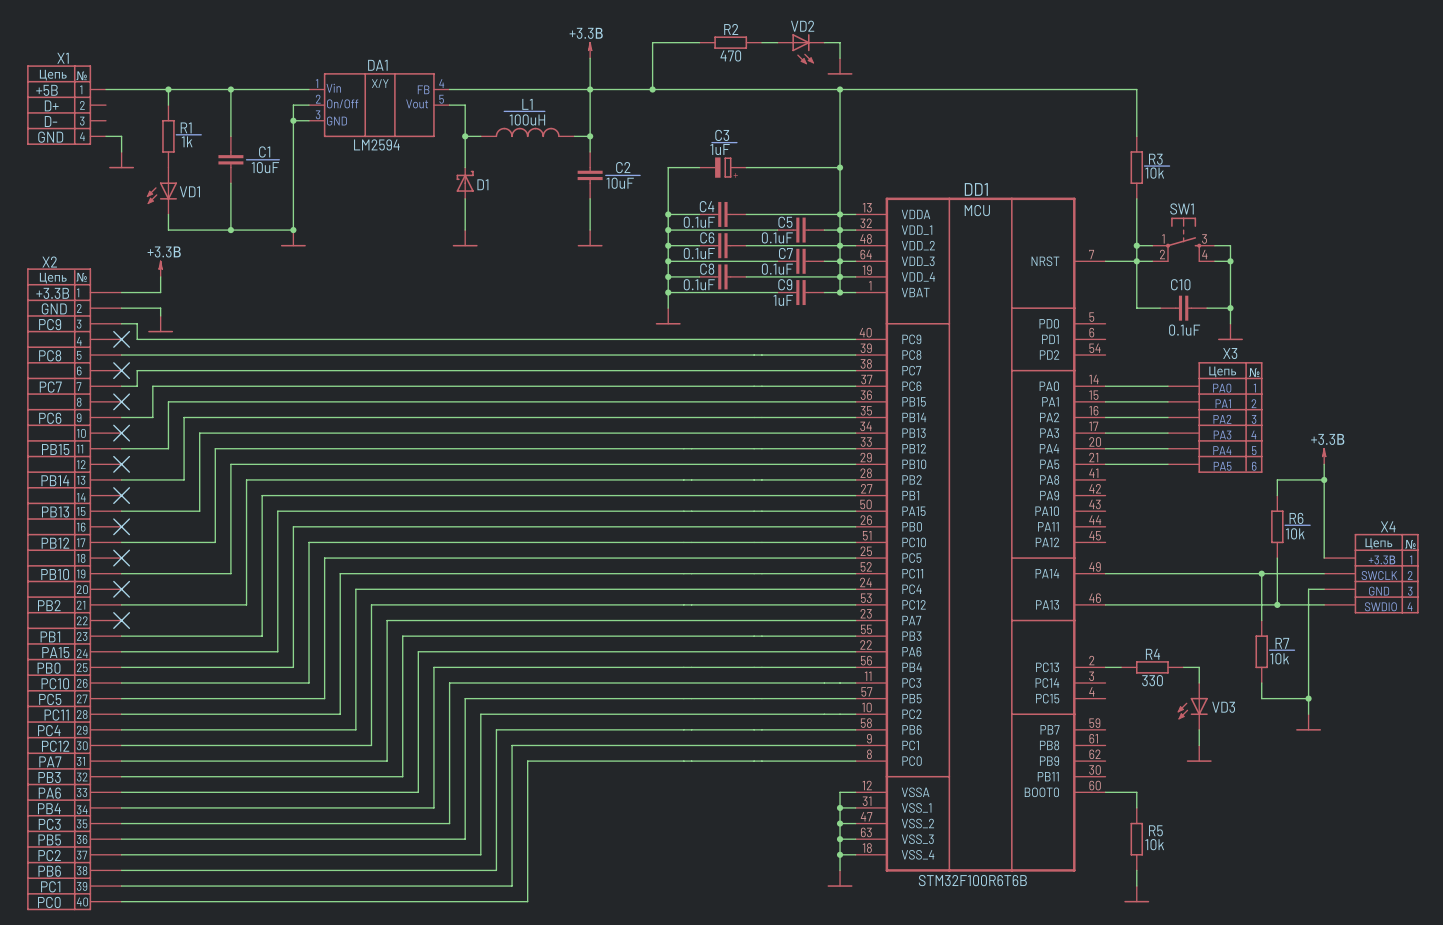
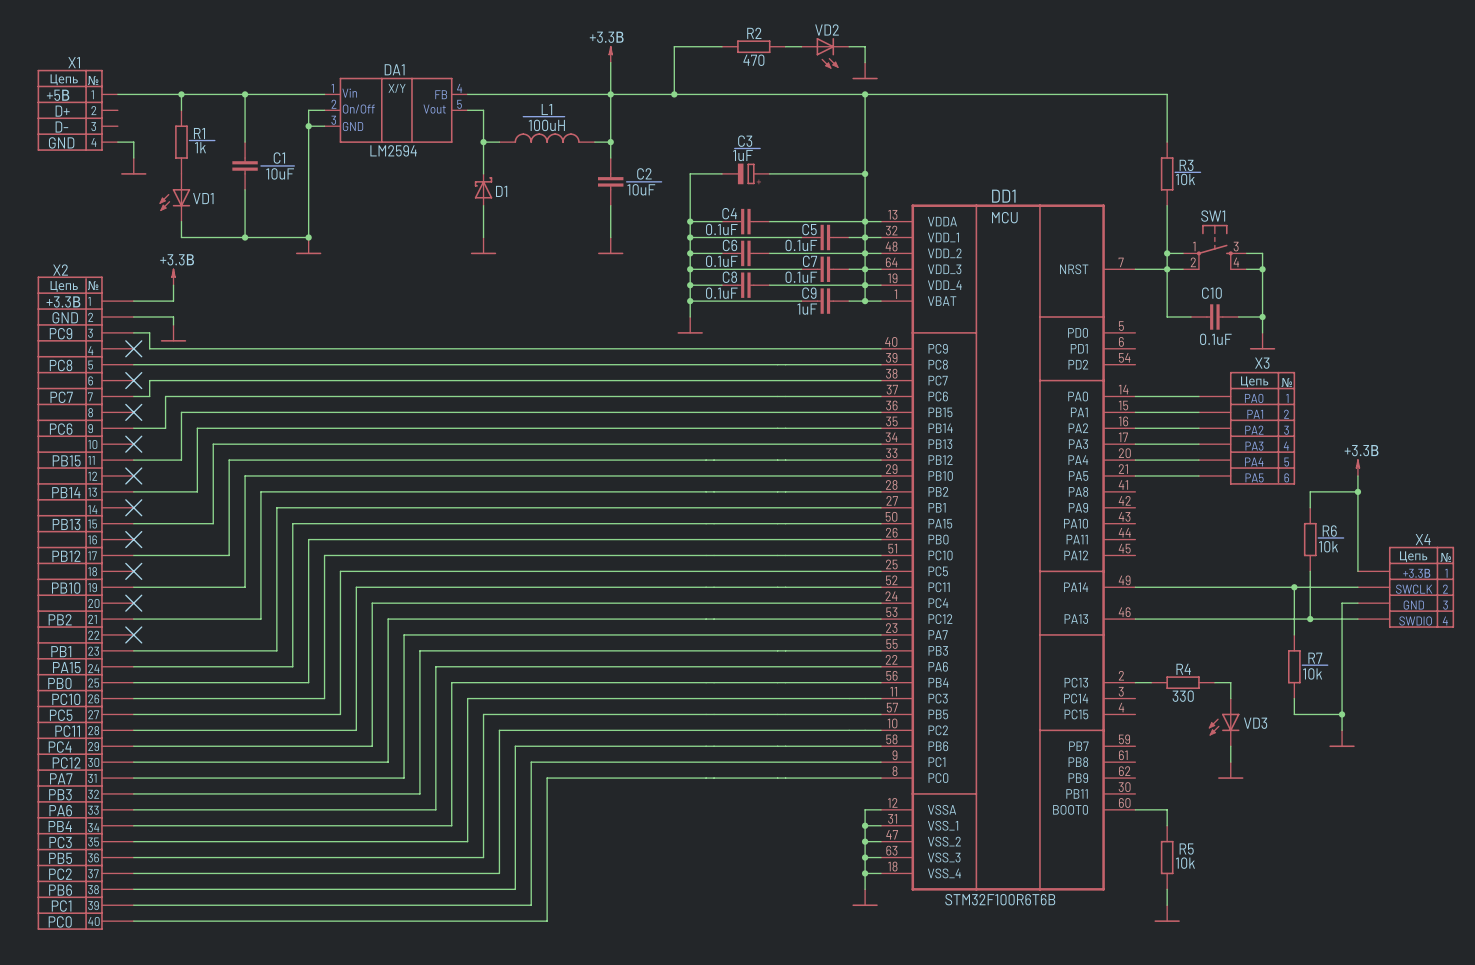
text: +5B (46, 90) -> +5В (58, 95)
text: +3.3B (52, 293) -> +3.3В (63, 301)

